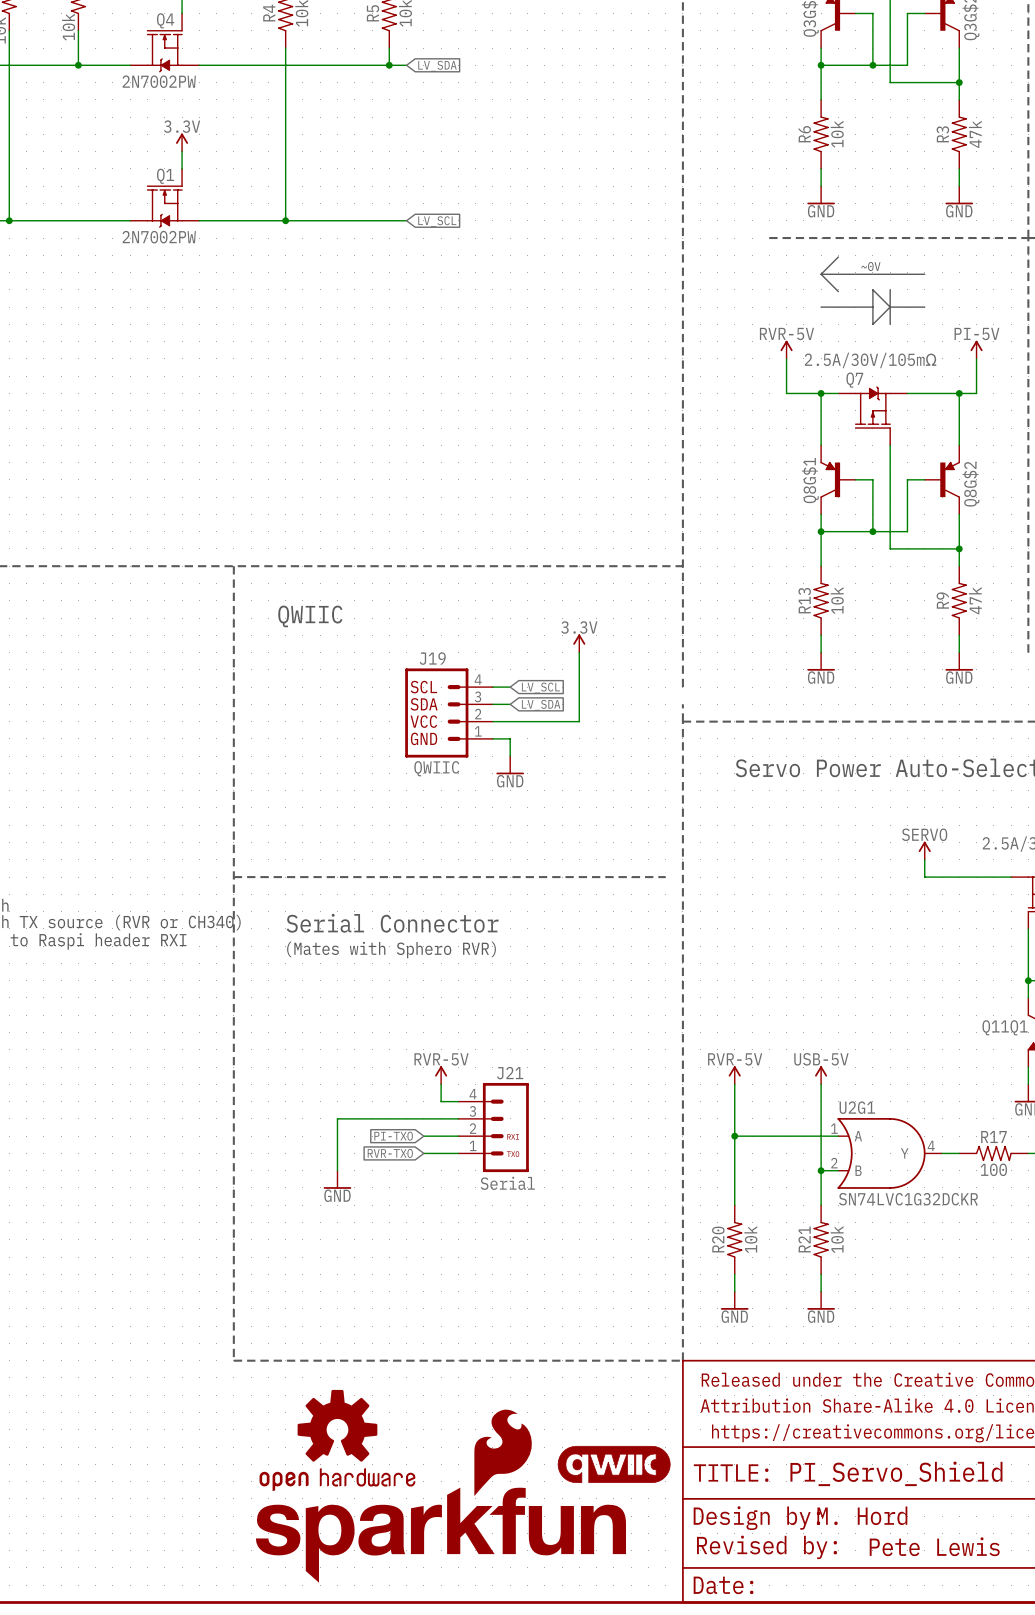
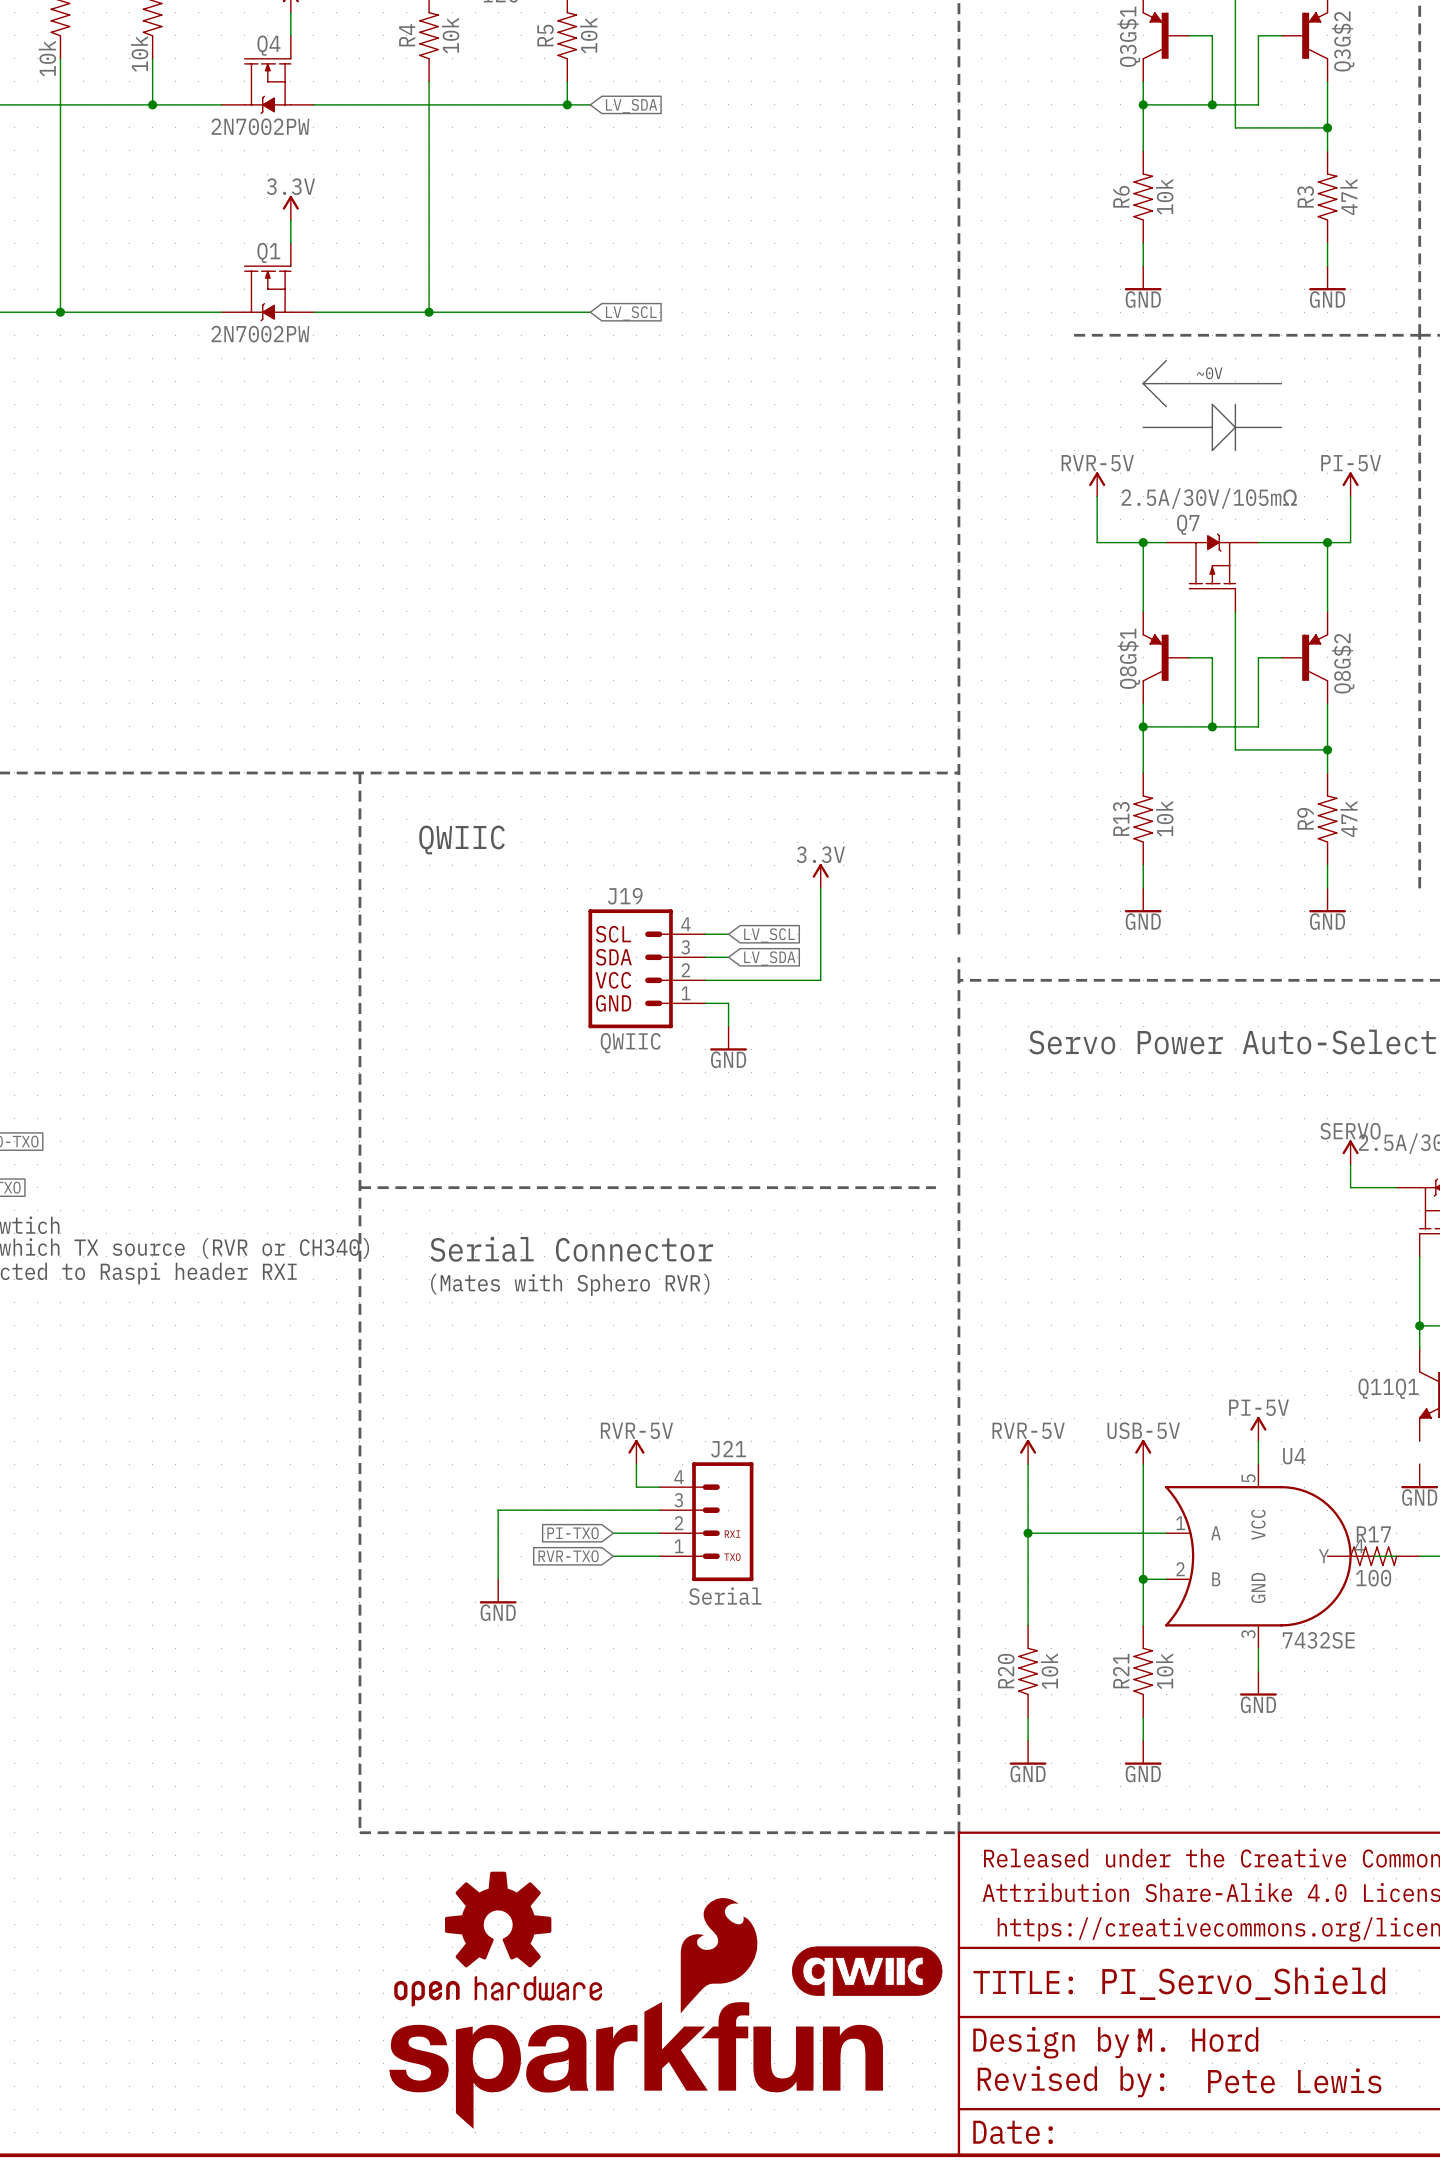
power symbol position: SERVO (924, 850) -> SERVO (1350, 1152)
wire: (924, 859) (924, 877) (976, 877) -> (1350, 1164) (1350, 1187)
power symbol: none -> PI-5V (1258, 1428)
wire: (1028, 1067) (1028, 1084) -> (1258, 1441) (1258, 1464)
U2G1: SN74LVC1G32DCKR (889, 1153) -> none
U4: none -> 7432SE (1269, 1556)
wire: (942, 1153) (959, 1153) -> (1373, 1556) (1396, 1556)
wire: none -> (1258, 1648) (1258, 1671)
power symbol: none -> GND (1258, 1683)

